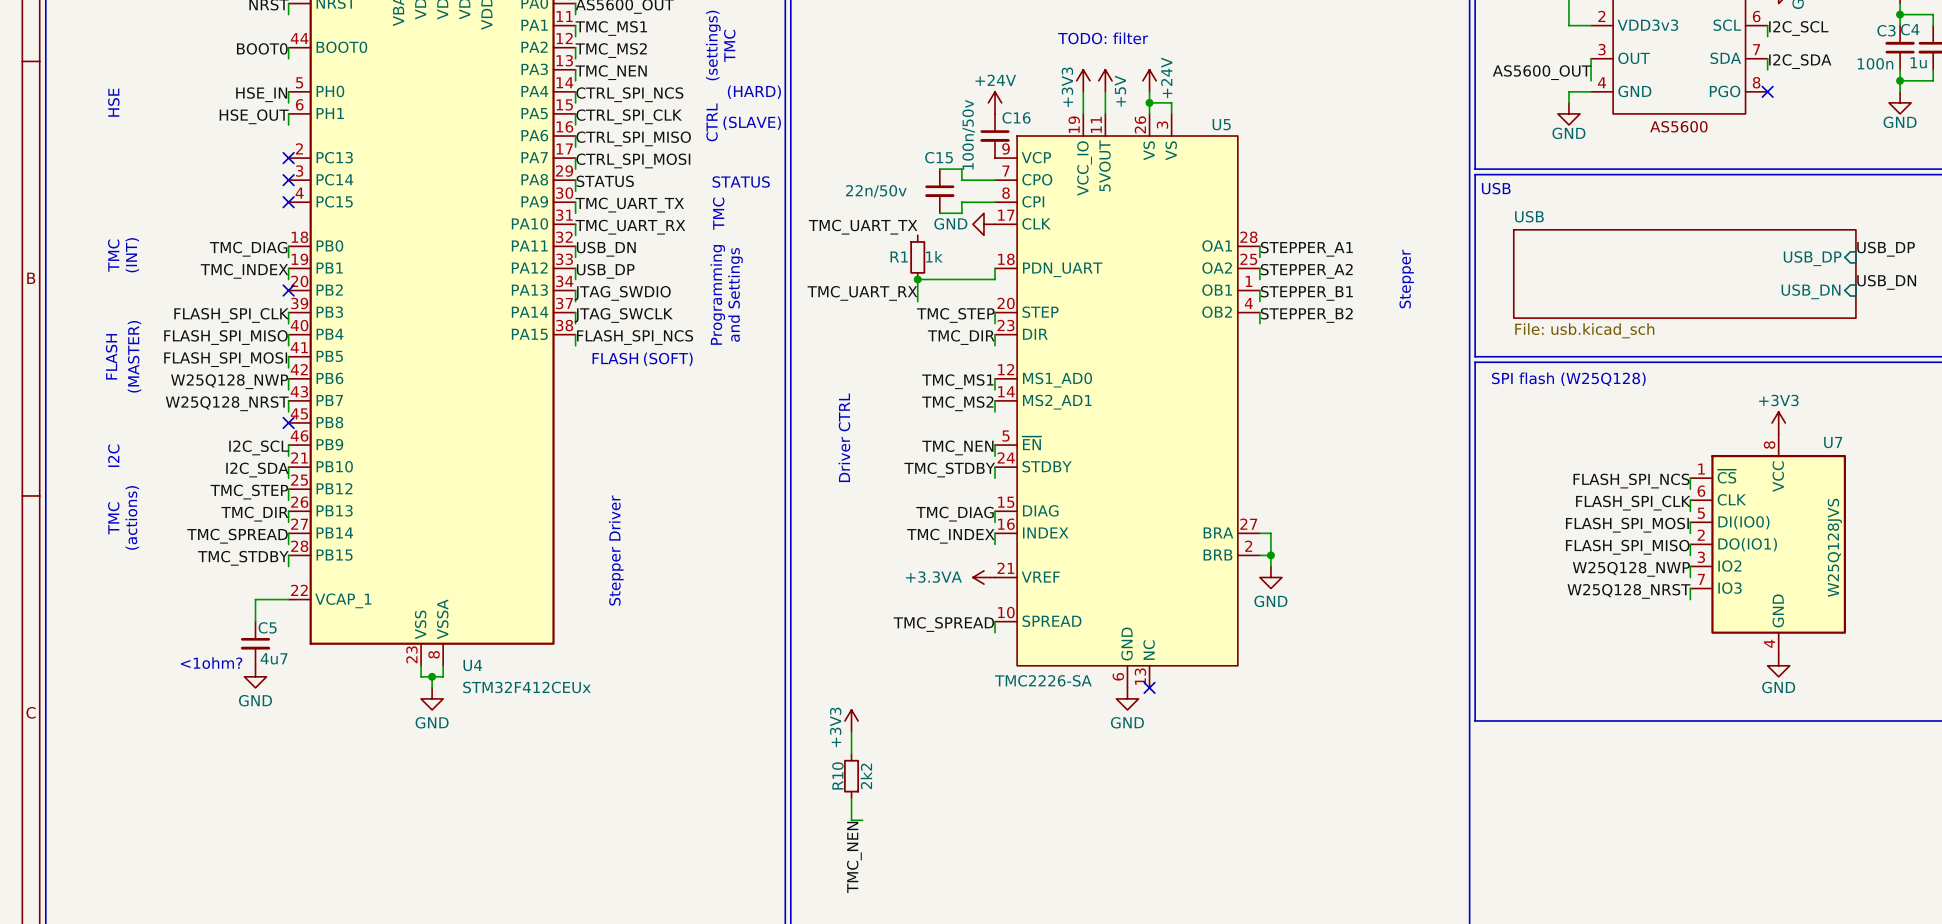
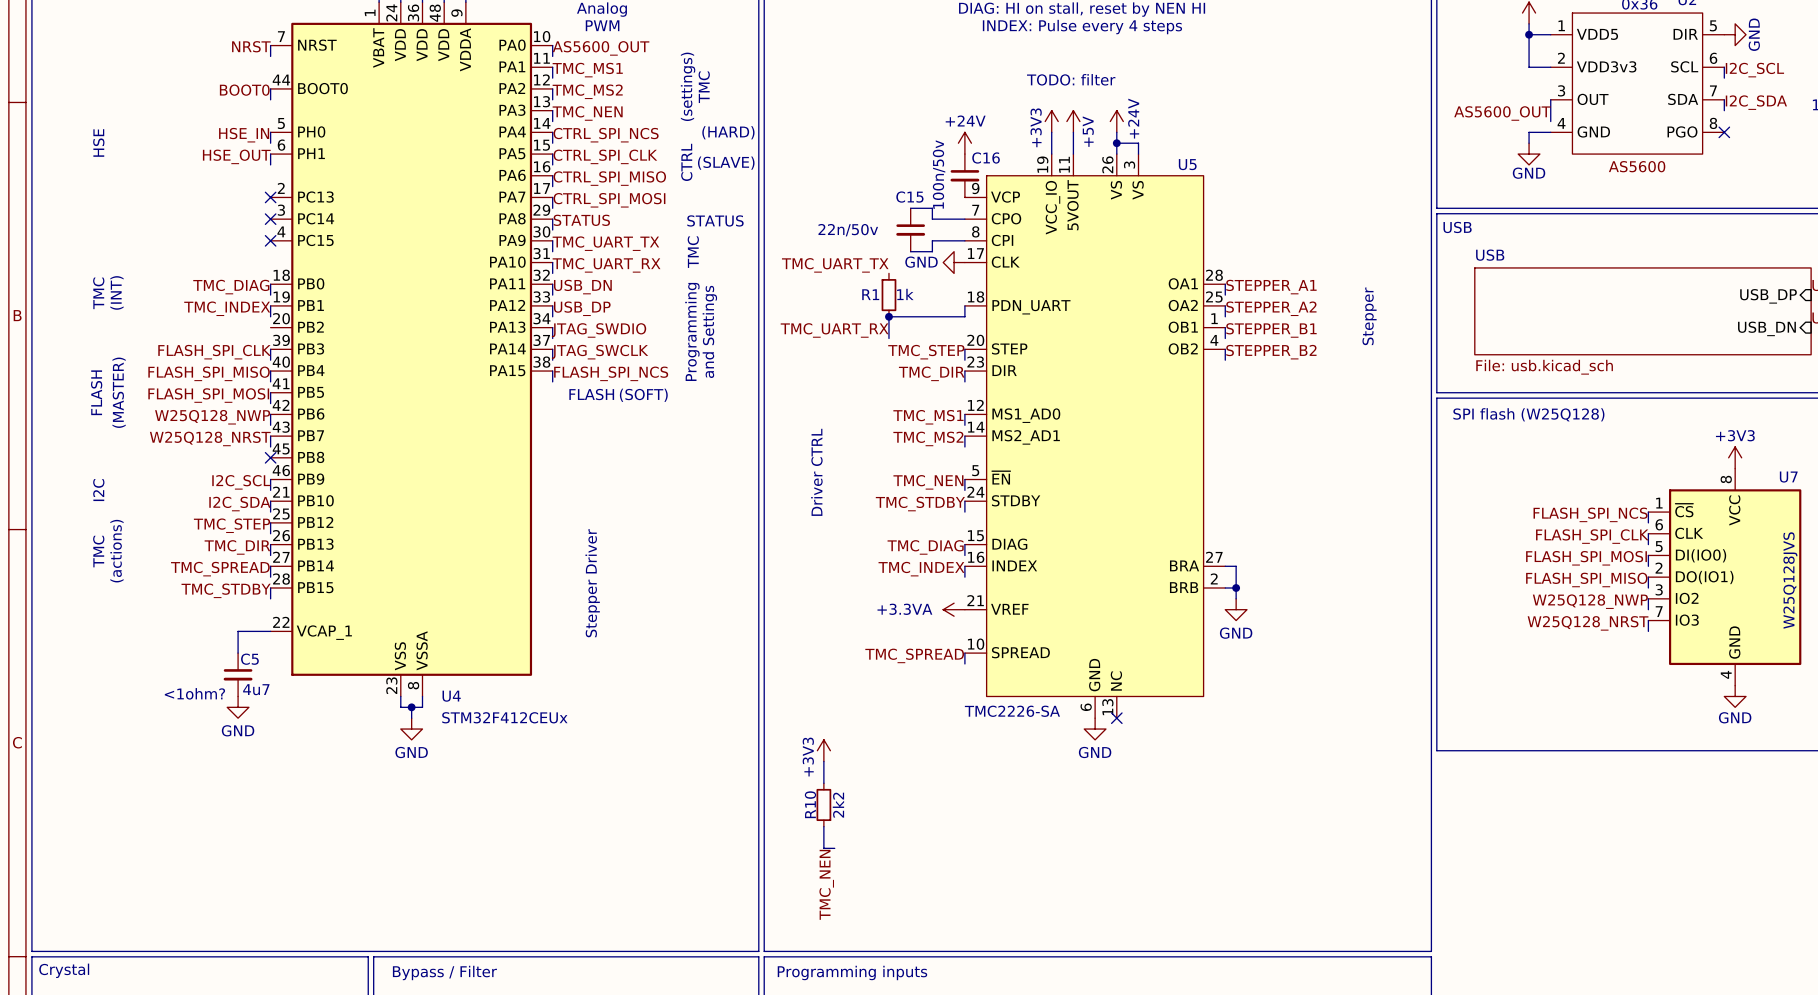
no-connect mark: (288, 290) -> none

